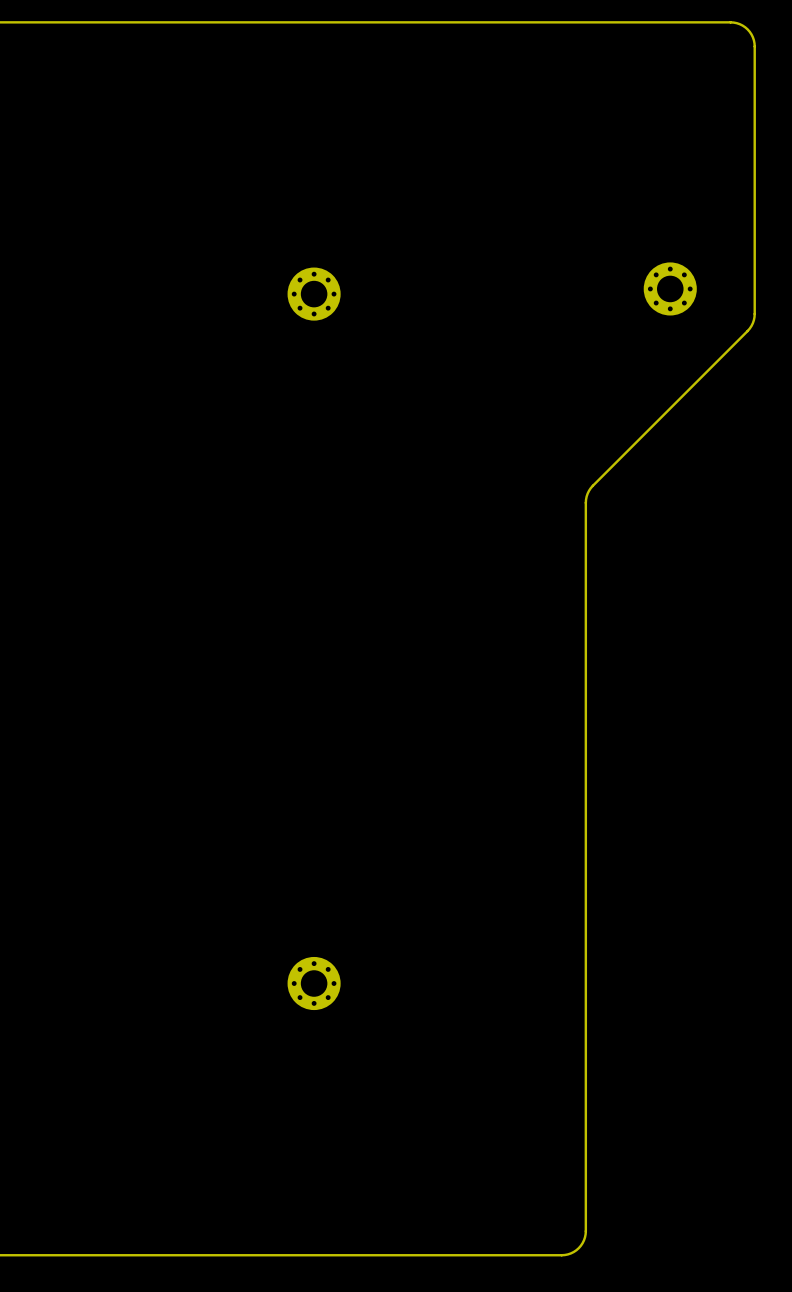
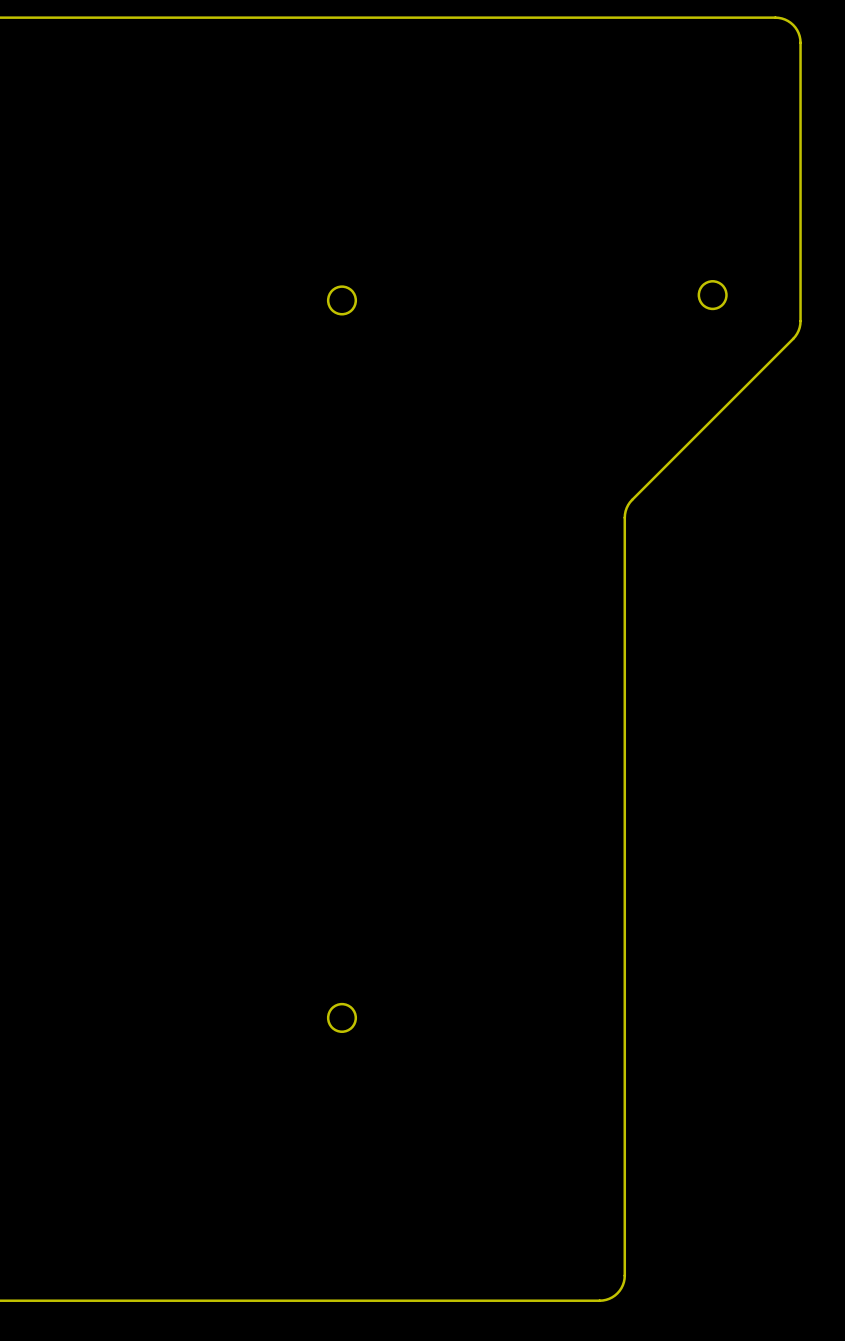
round board edge: none -> [697, 280, 728, 311]
round board edge: none -> [326, 285, 358, 316]
part: (670, 288) -> none
part: (314, 294) -> none
round board edge: none -> [326, 1002, 358, 1033]
part: (314, 983) -> none

